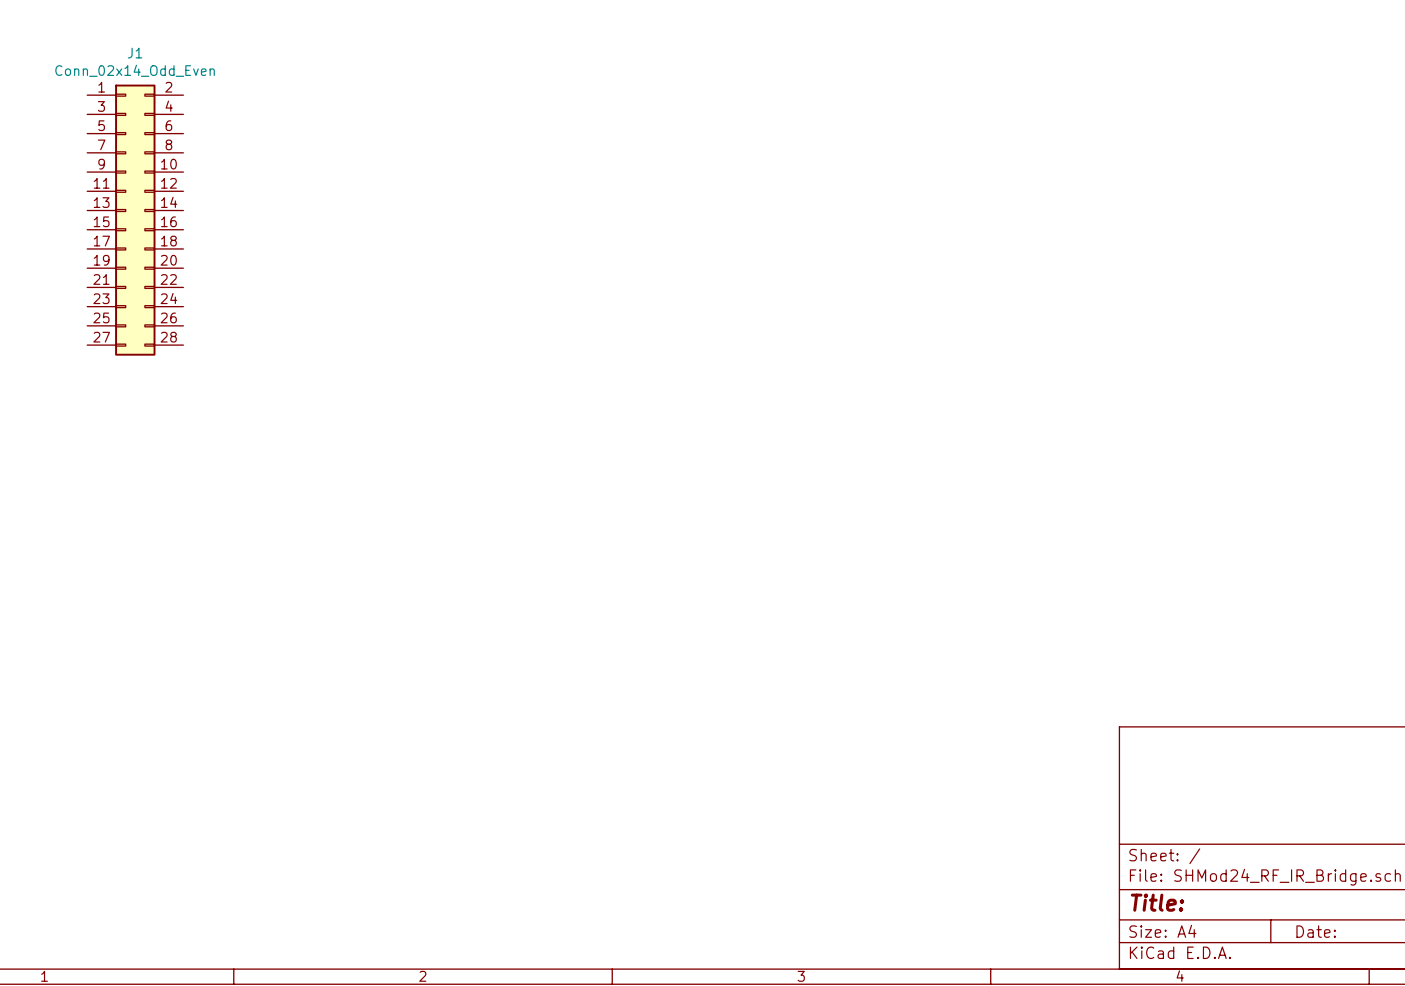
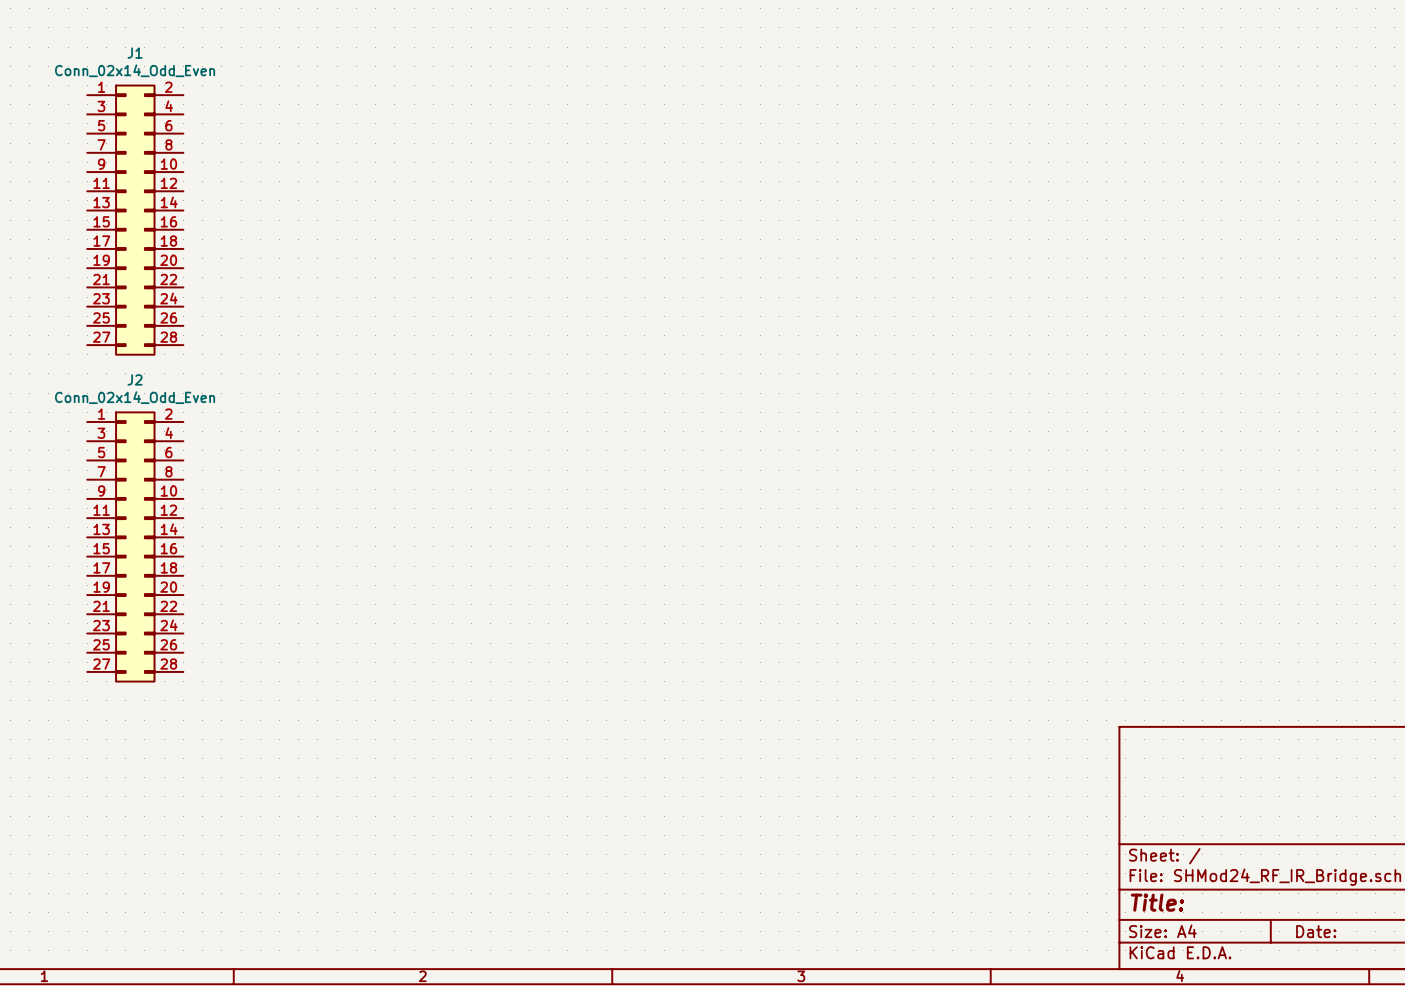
J2: none -> Conn_02x14_Odd_Even (135, 546)

